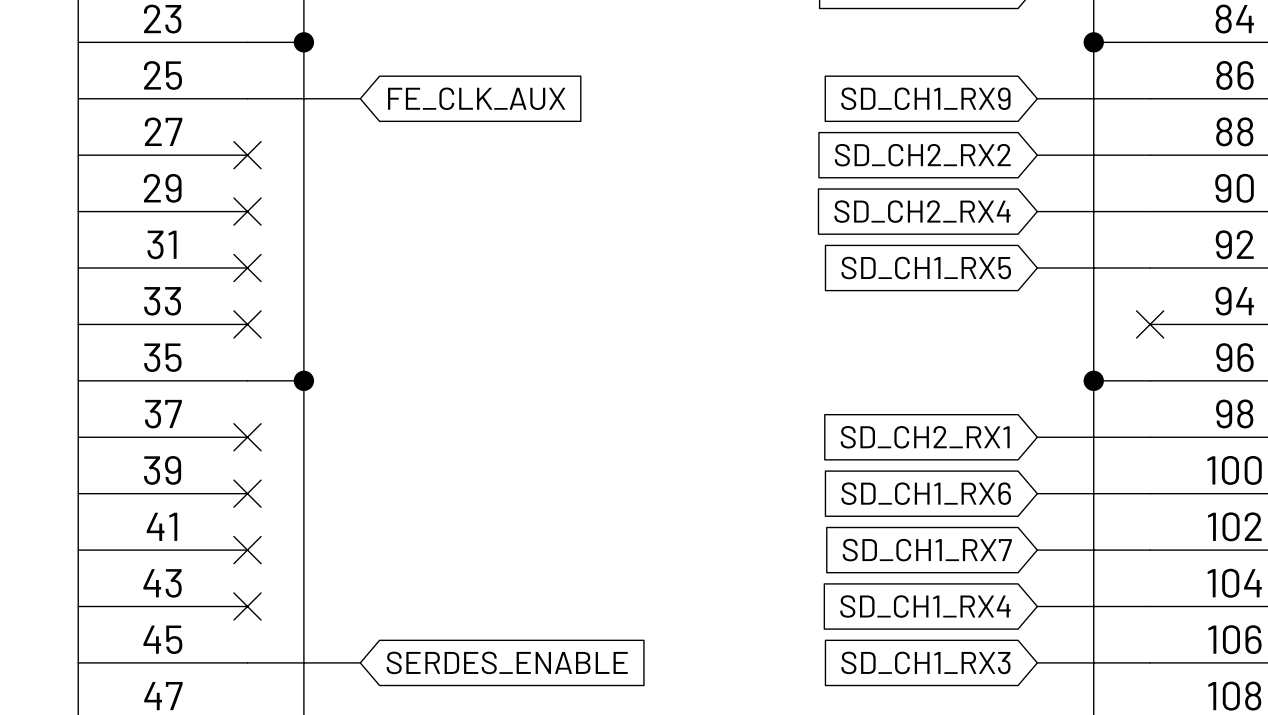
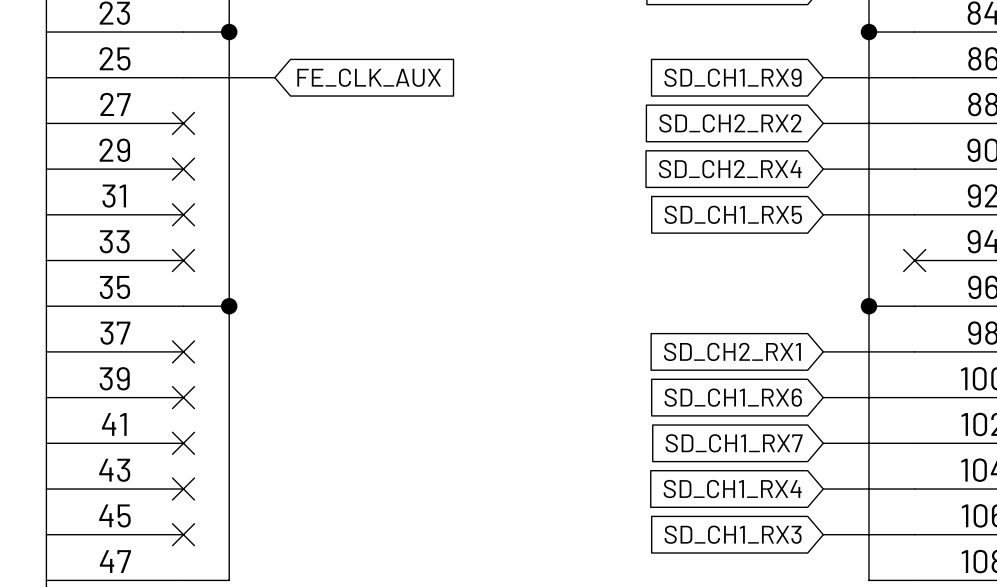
wire: (247, 662) (360, 662) -> none
no-connect mark: none -> (183, 534)
global label: SERDES_ENABLE (507, 662) -> none

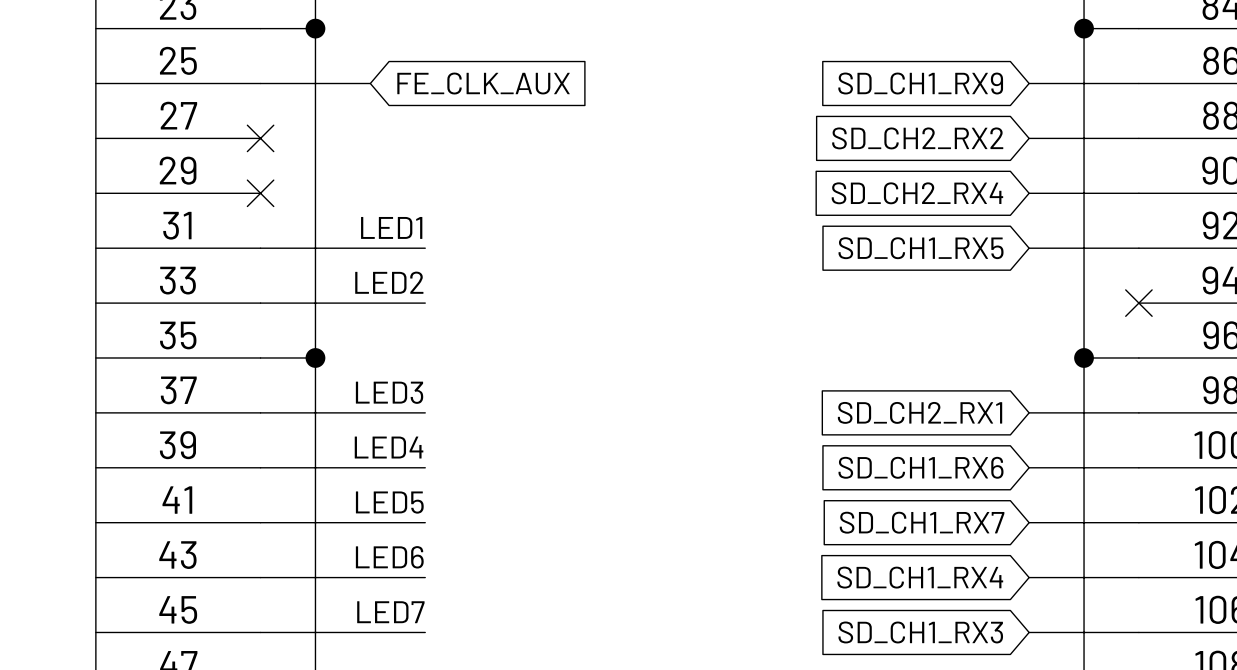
label: none -> LED1 (391, 227)
wire: none -> (260, 248) (425, 248)
no-connect mark: (183, 214) -> none
label: none -> LED2 (389, 282)
wire: none -> (260, 303) (425, 303)
no-connect mark: (183, 260) -> none
label: none -> LED3 (389, 392)
wire: none -> (260, 412) (425, 412)
no-connect mark: (183, 351) -> none
label: none -> LED4 (389, 447)
wire: none -> (260, 467) (425, 467)
no-connect mark: (183, 397) -> none
label: none -> LED5 (389, 502)
wire: none -> (260, 522) (425, 522)
no-connect mark: (183, 443) -> none
label: none -> LED6 (389, 557)
wire: none -> (260, 577) (425, 577)
no-connect mark: (183, 489) -> none
label: none -> LED7 (390, 612)
wire: none -> (260, 632) (425, 632)
no-connect mark: (183, 534) -> none

